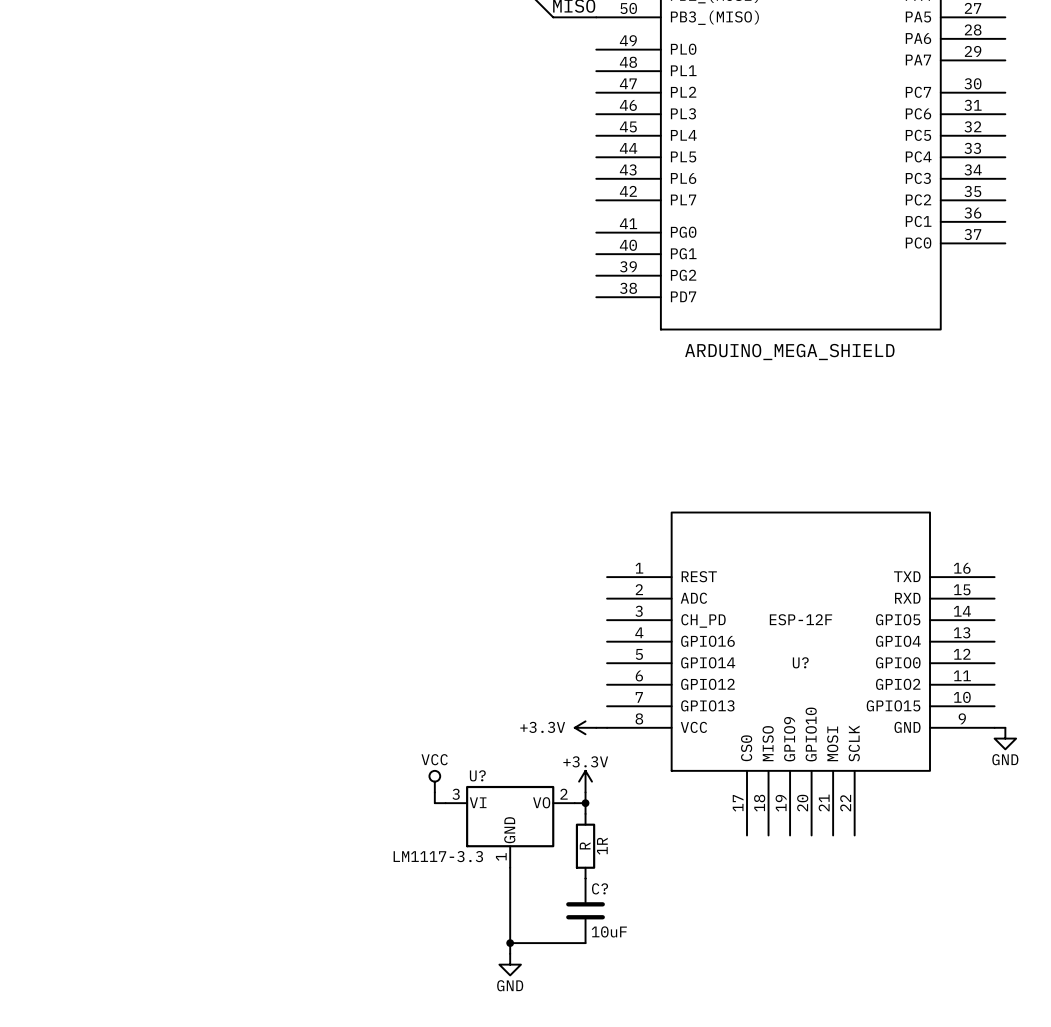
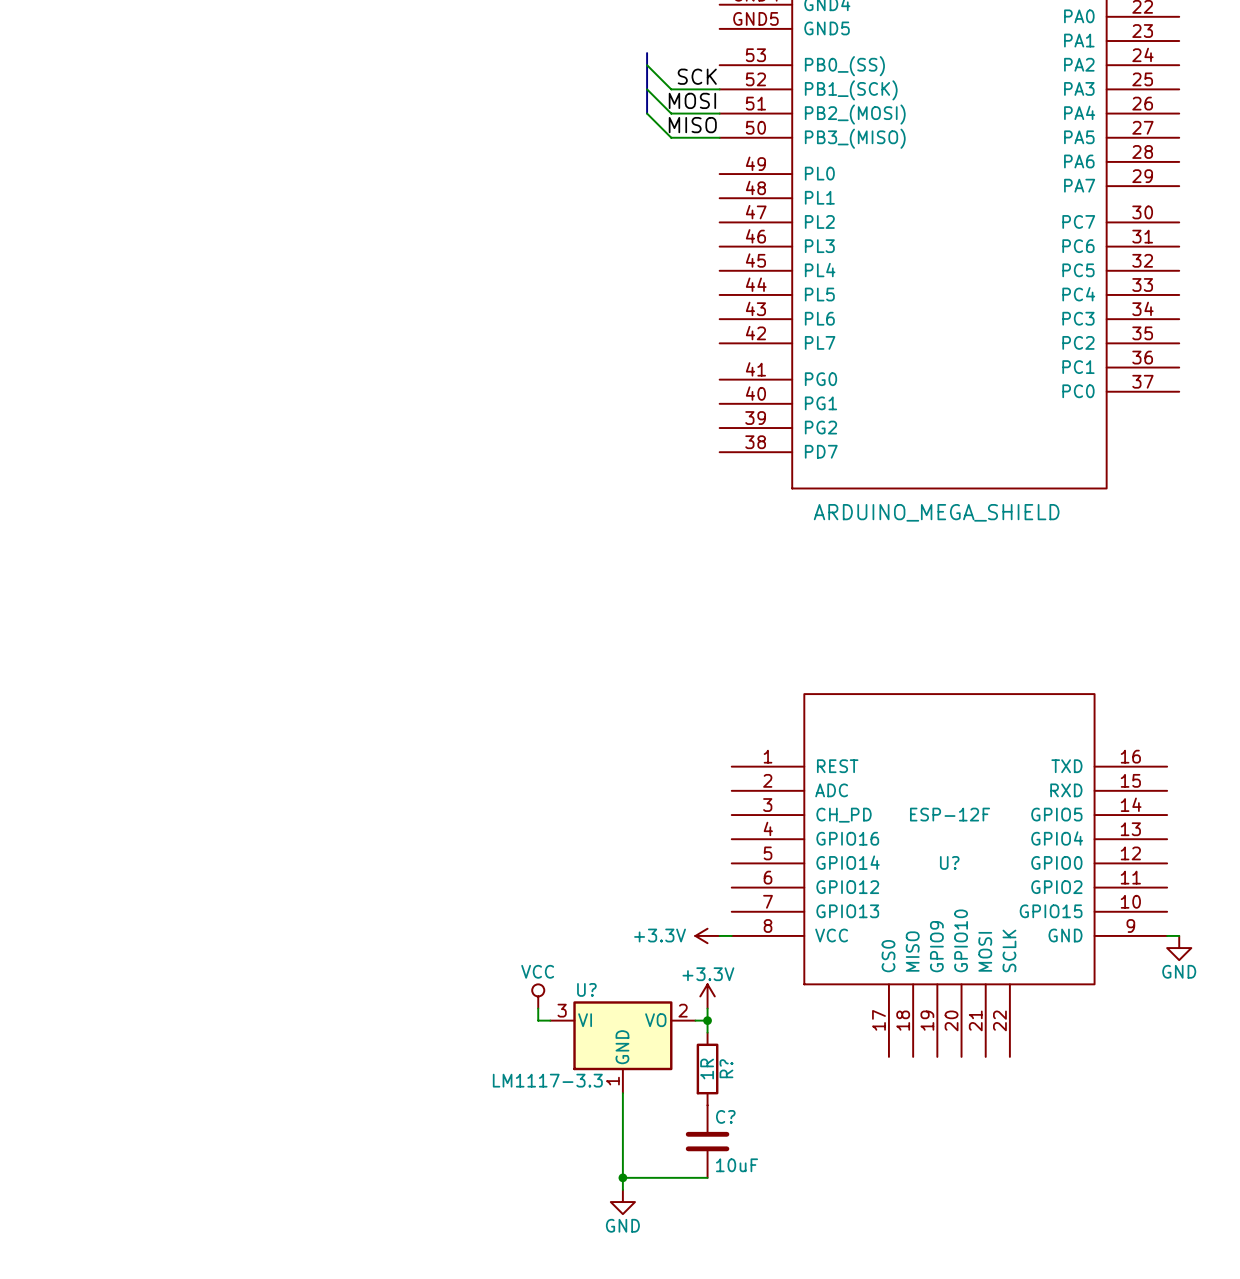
1R value: R (585, 845) -> 1R (707, 1069)
1R name: 1R (602, 846) -> R? (726, 1068)

